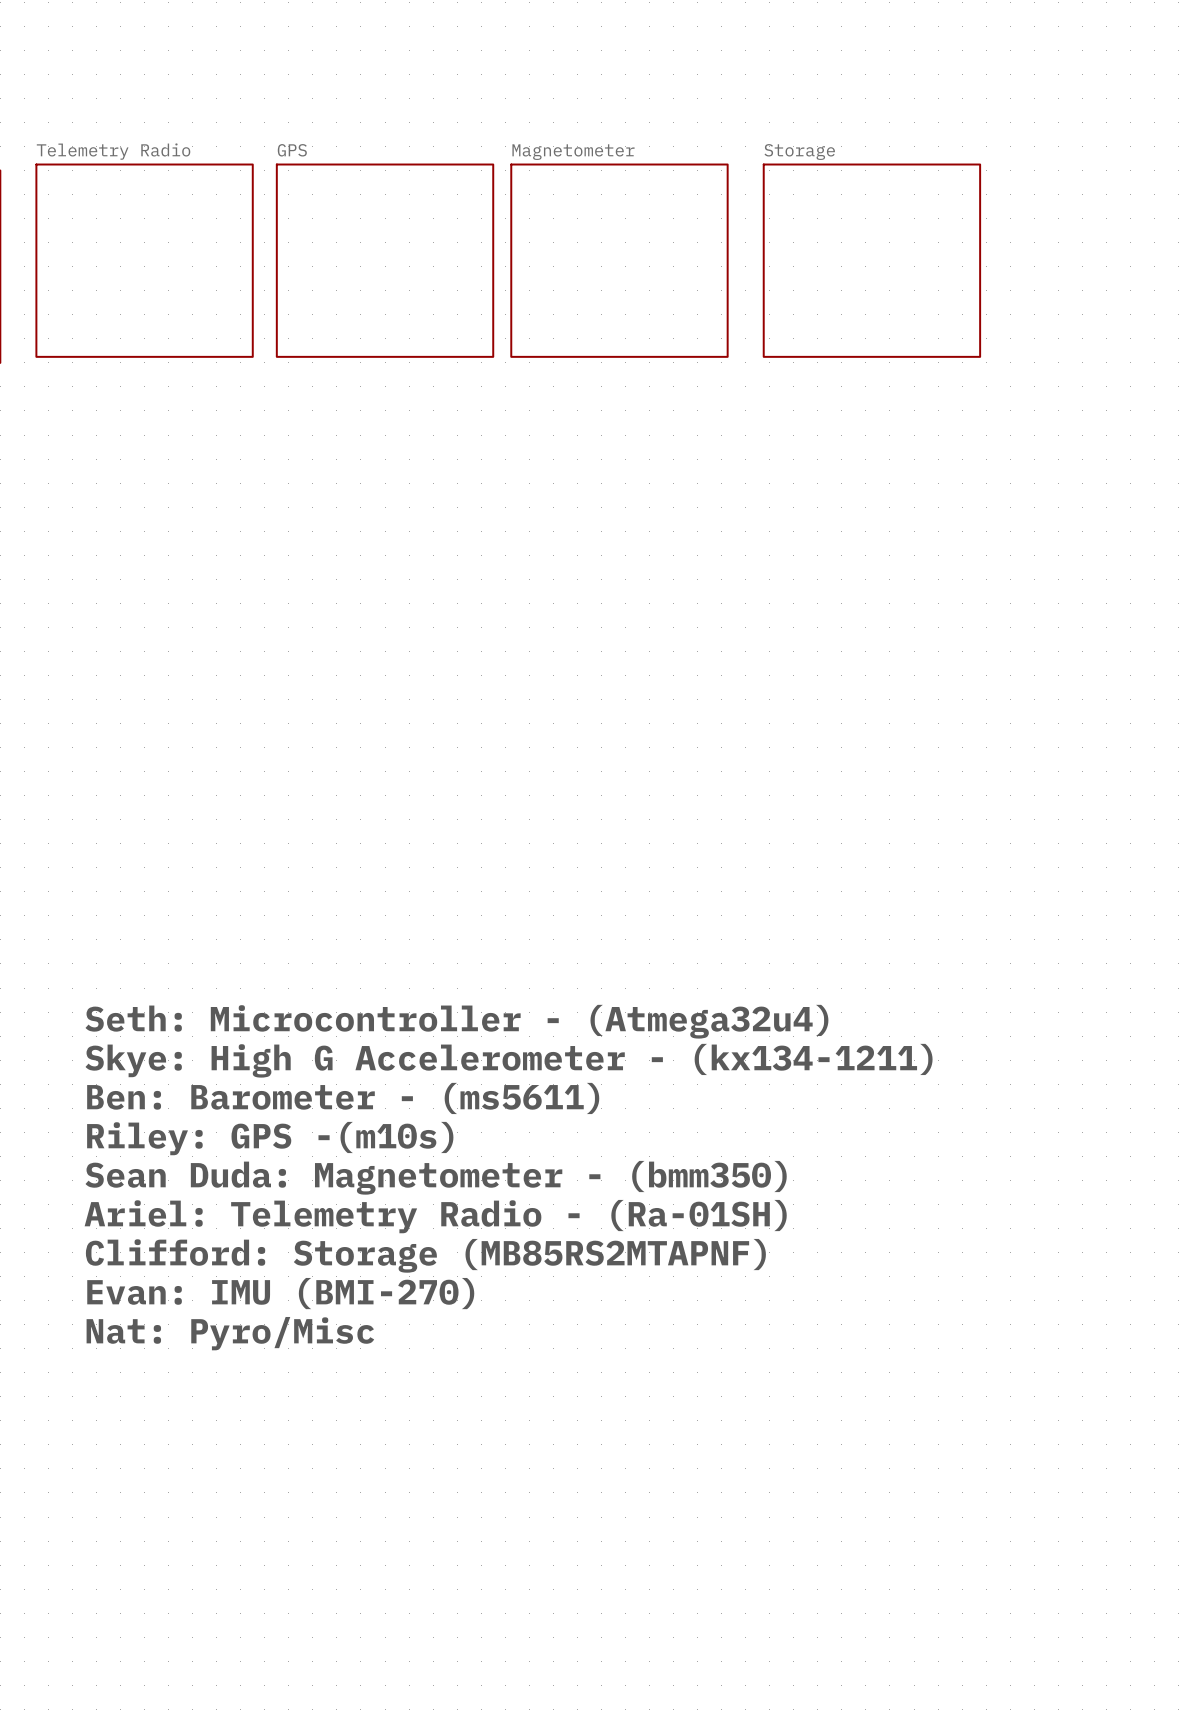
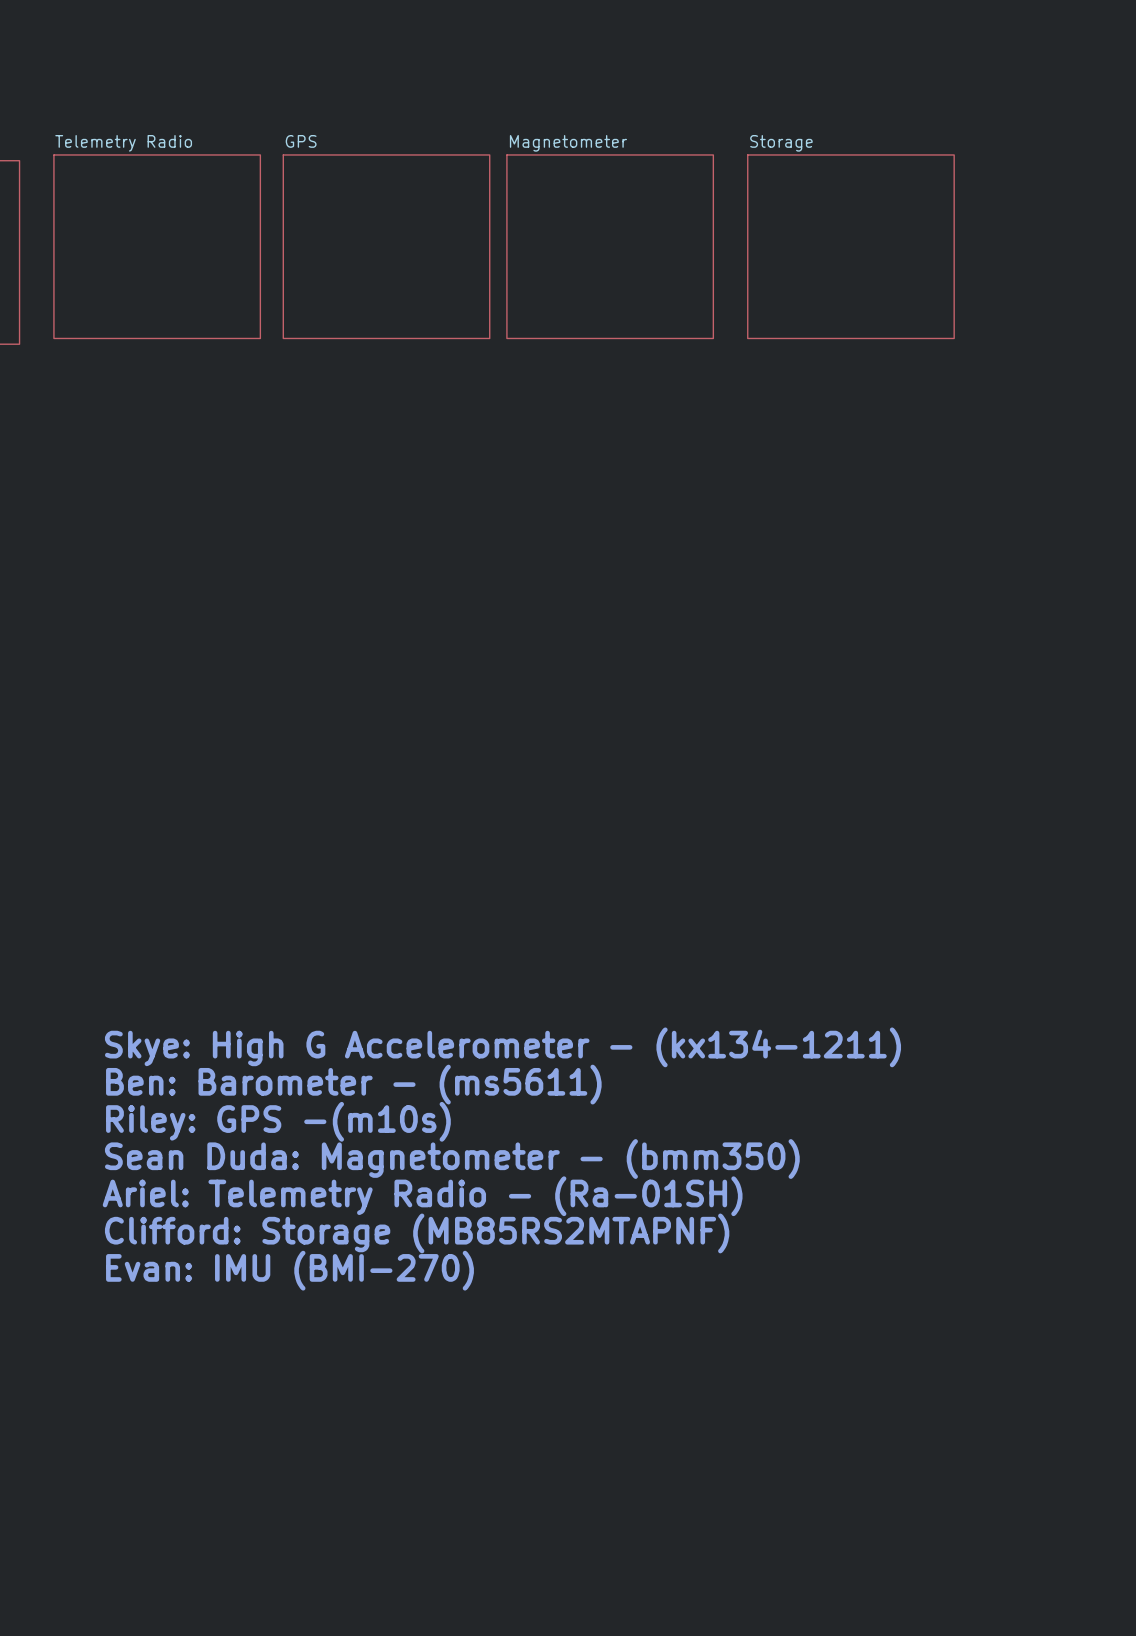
text: Seth: Microcontroller - (Atmega32u4) (456, 1021) -> none
text: Skye: High G Accelerometer - (kx134-1211) (509, 1060) -> none
text: Ben: Barometer - (ms5611) (343, 1098) -> Skye: High G Accelerometer - (kx134-1211) (502, 1047)
text: Riley: GPS -(m10s) (270, 1138) -> Ben: Barometer - (ms5611) (353, 1084)
text: Sean Duda: Magnetometer - (bmm350) (436, 1177) -> Riley: GPS -(m10s) (278, 1121)
text: Ariel: Telemetry Radio - (Ra-01SH) (435, 1216) -> Sean Duda: Magnetometer - (bmm350) (452, 1159)
text: Clifford: Storage (MB85RS2MTAPNF) (425, 1255) -> Ariel: Telemetry Radio - (Ra-01SH) (422, 1196)
text: Evan: IMU (BMI-270) (280, 1293) -> Clifford: Storage (MB85RS2MTAPNF) (417, 1233)
text: Nat: Pyro/Misc (230, 1333) -> Evan: IMU (BMI-270) (289, 1270)

